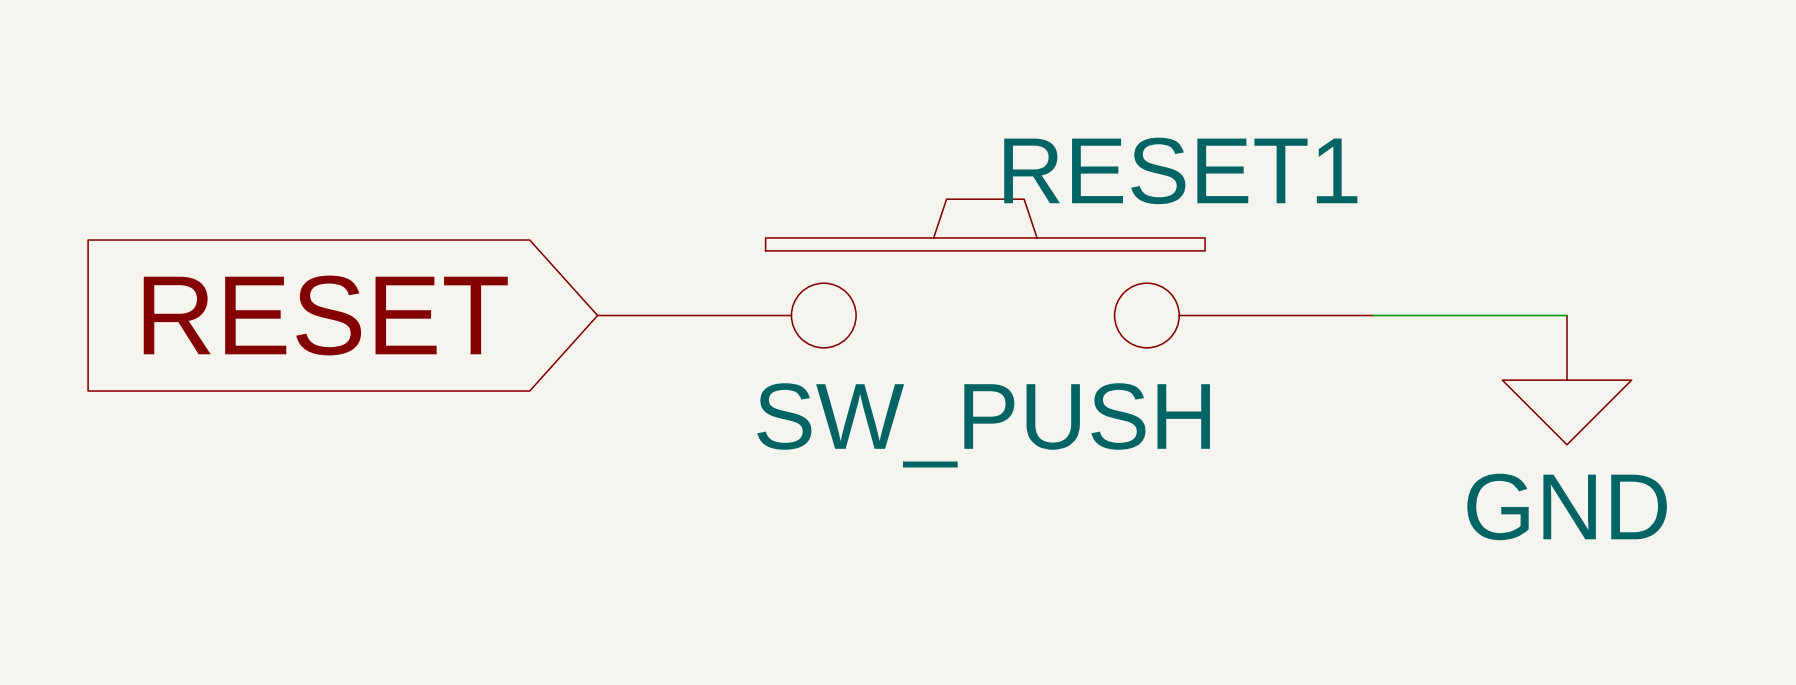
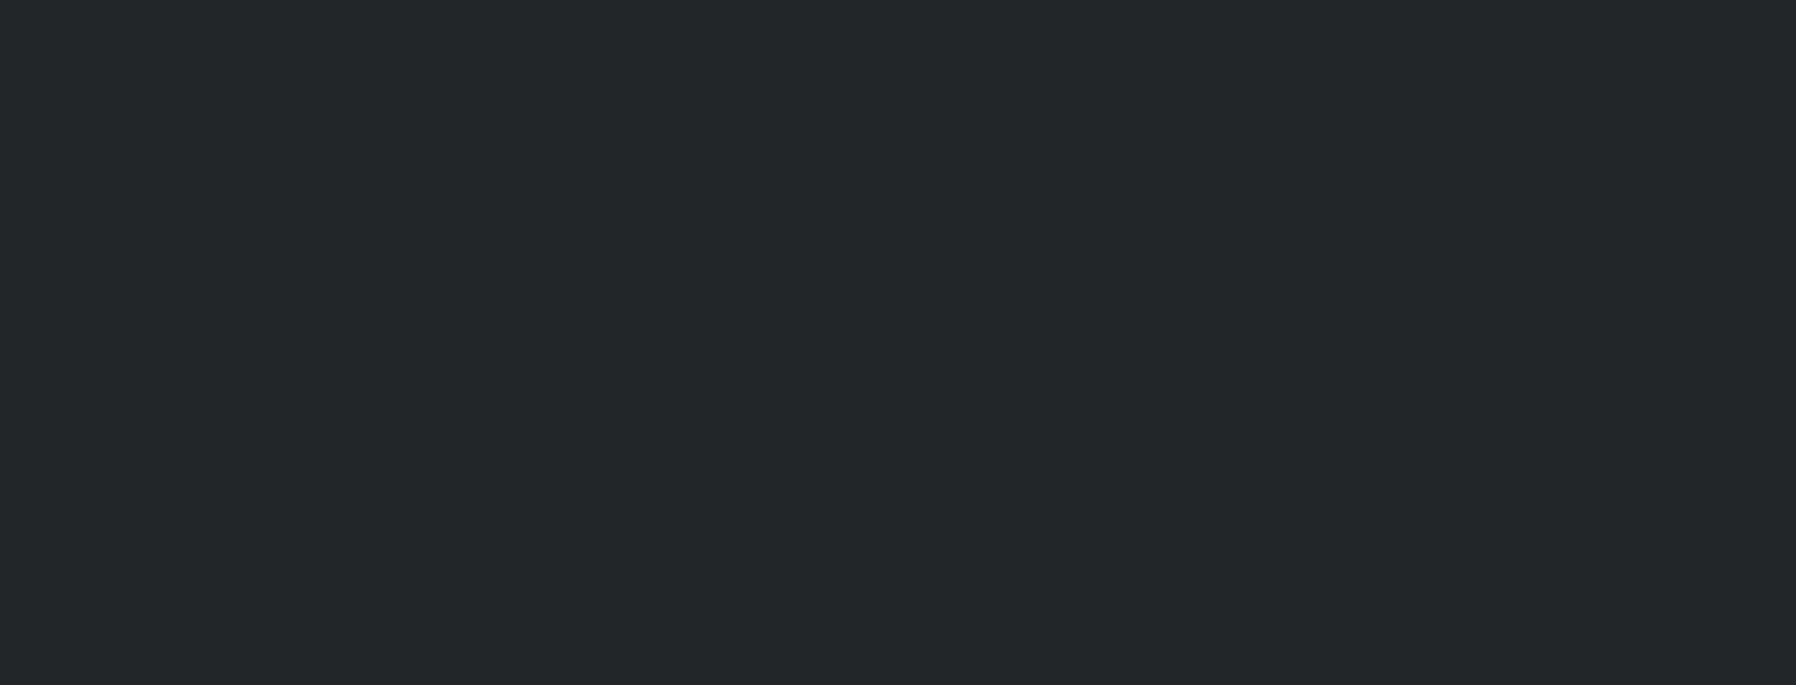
RESET1: SW_PUSH (985, 273) -> none
global label: RESET (325, 315) -> none
wire: (1373, 315) (1566, 315) -> none
power symbol: GND (1566, 380) -> none

